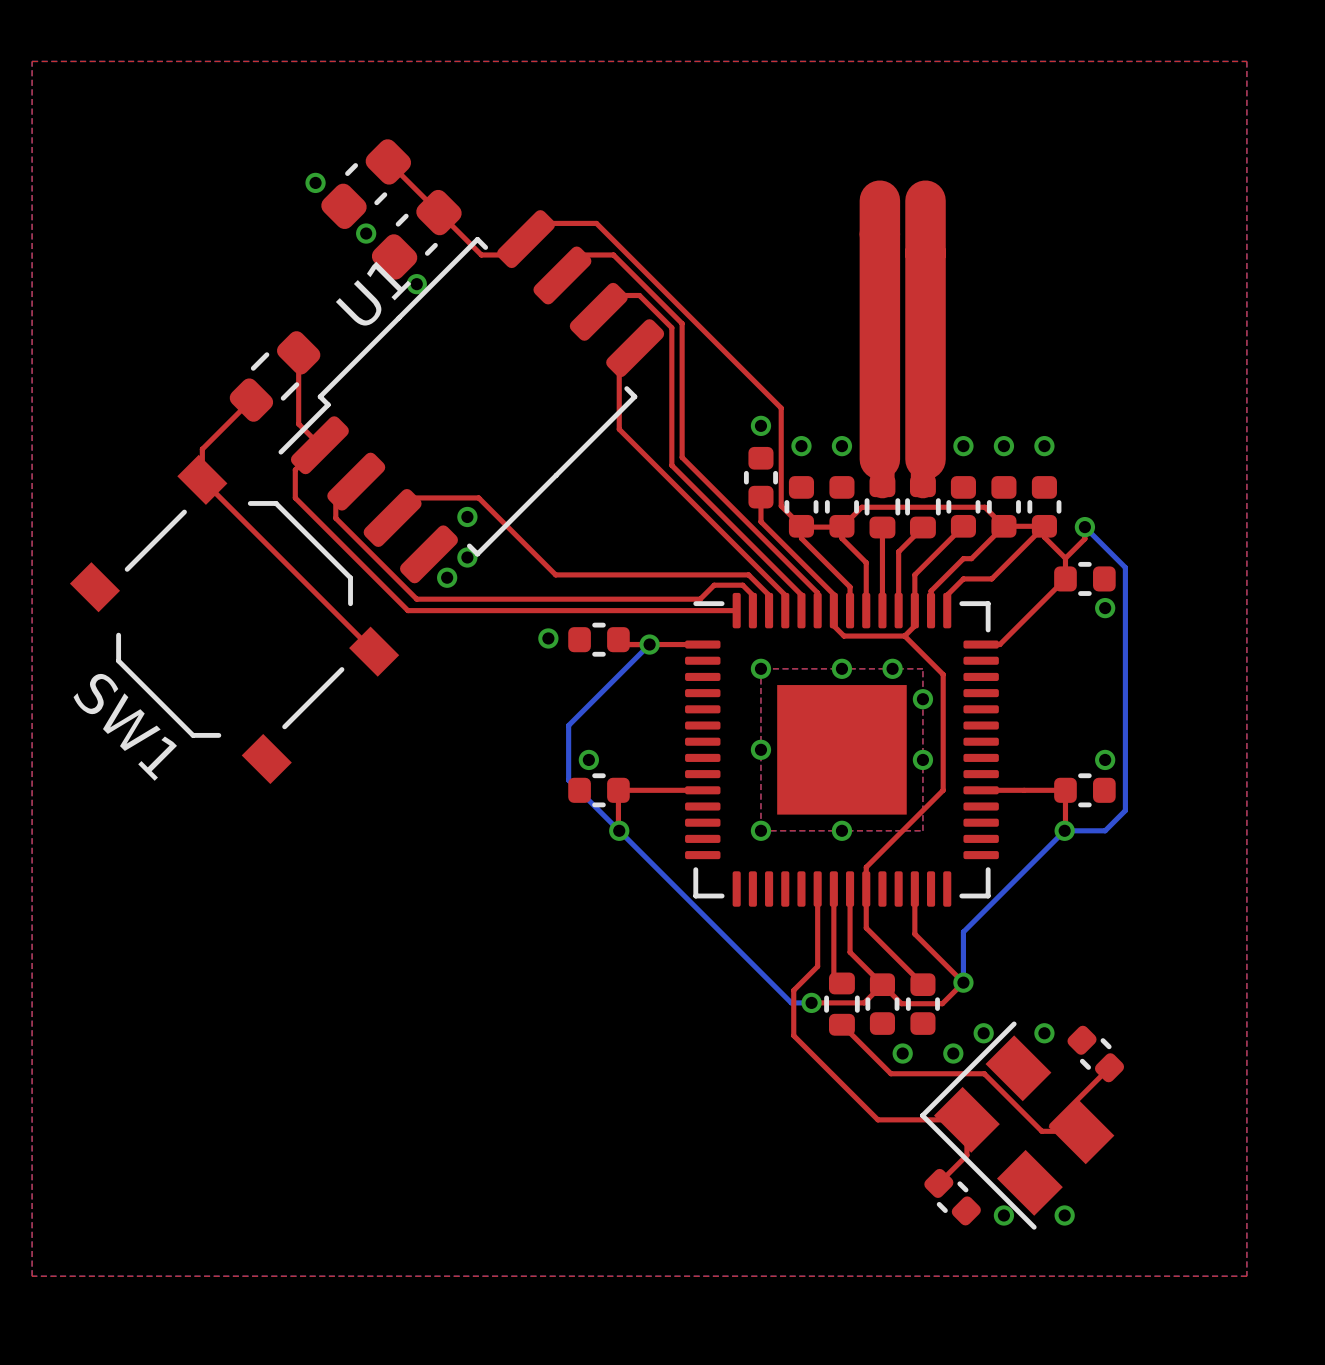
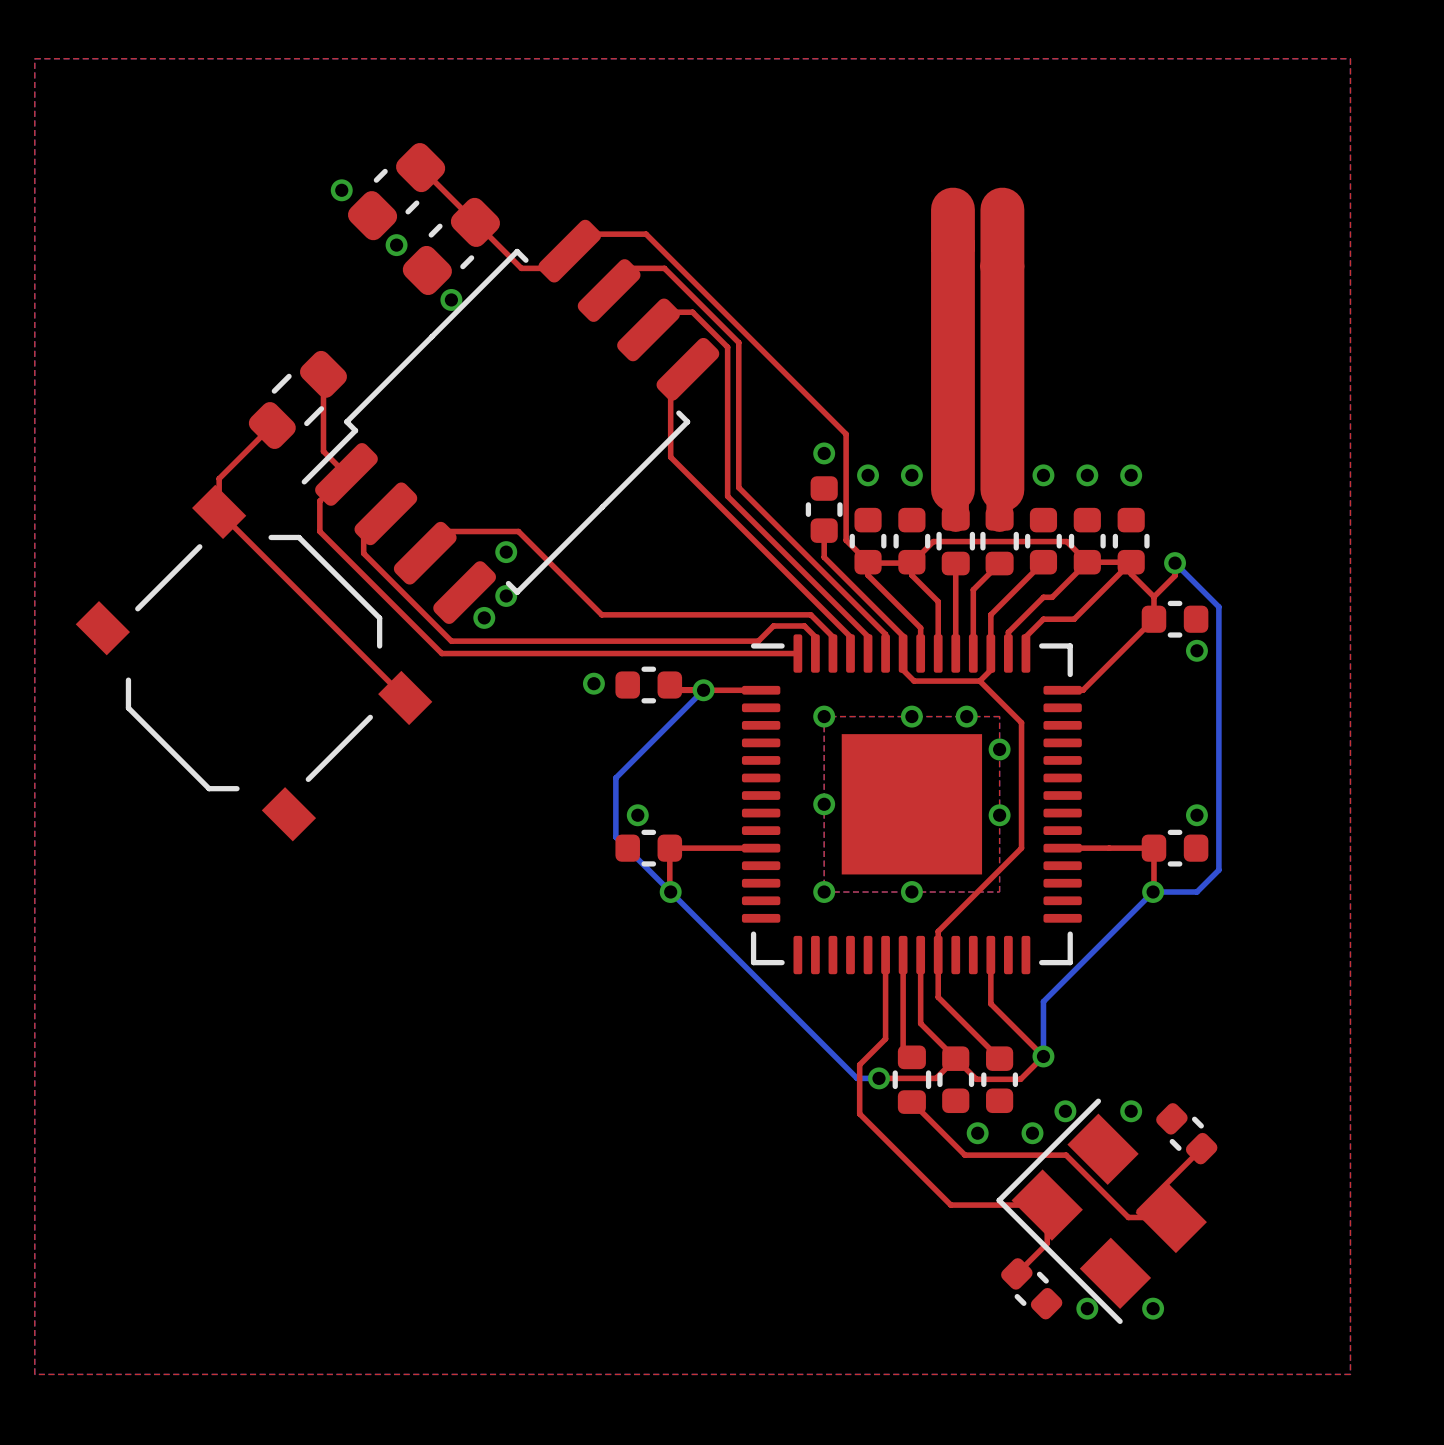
U1 name: U1 (373, 293) -> none
SW1 name: SW1 (125, 727) -> none

